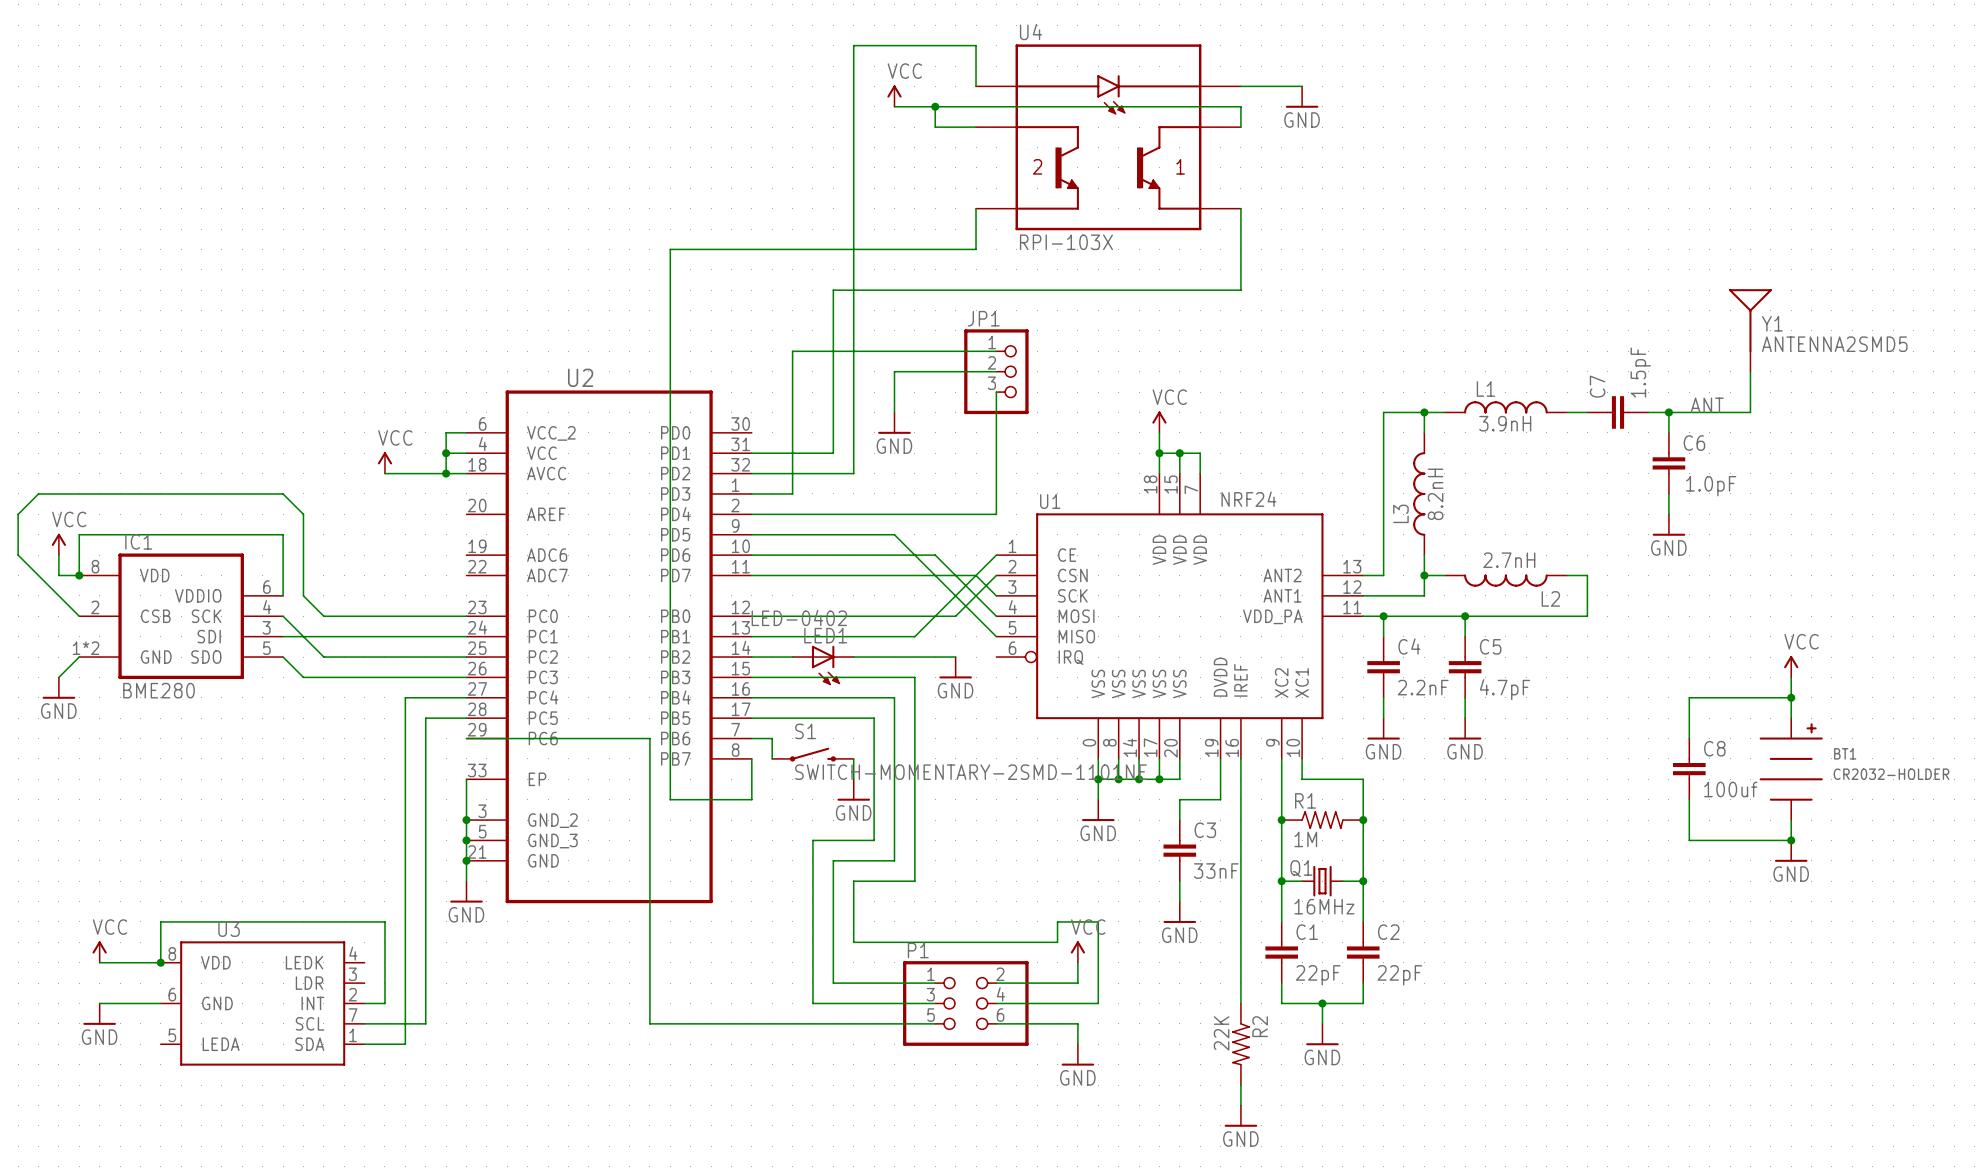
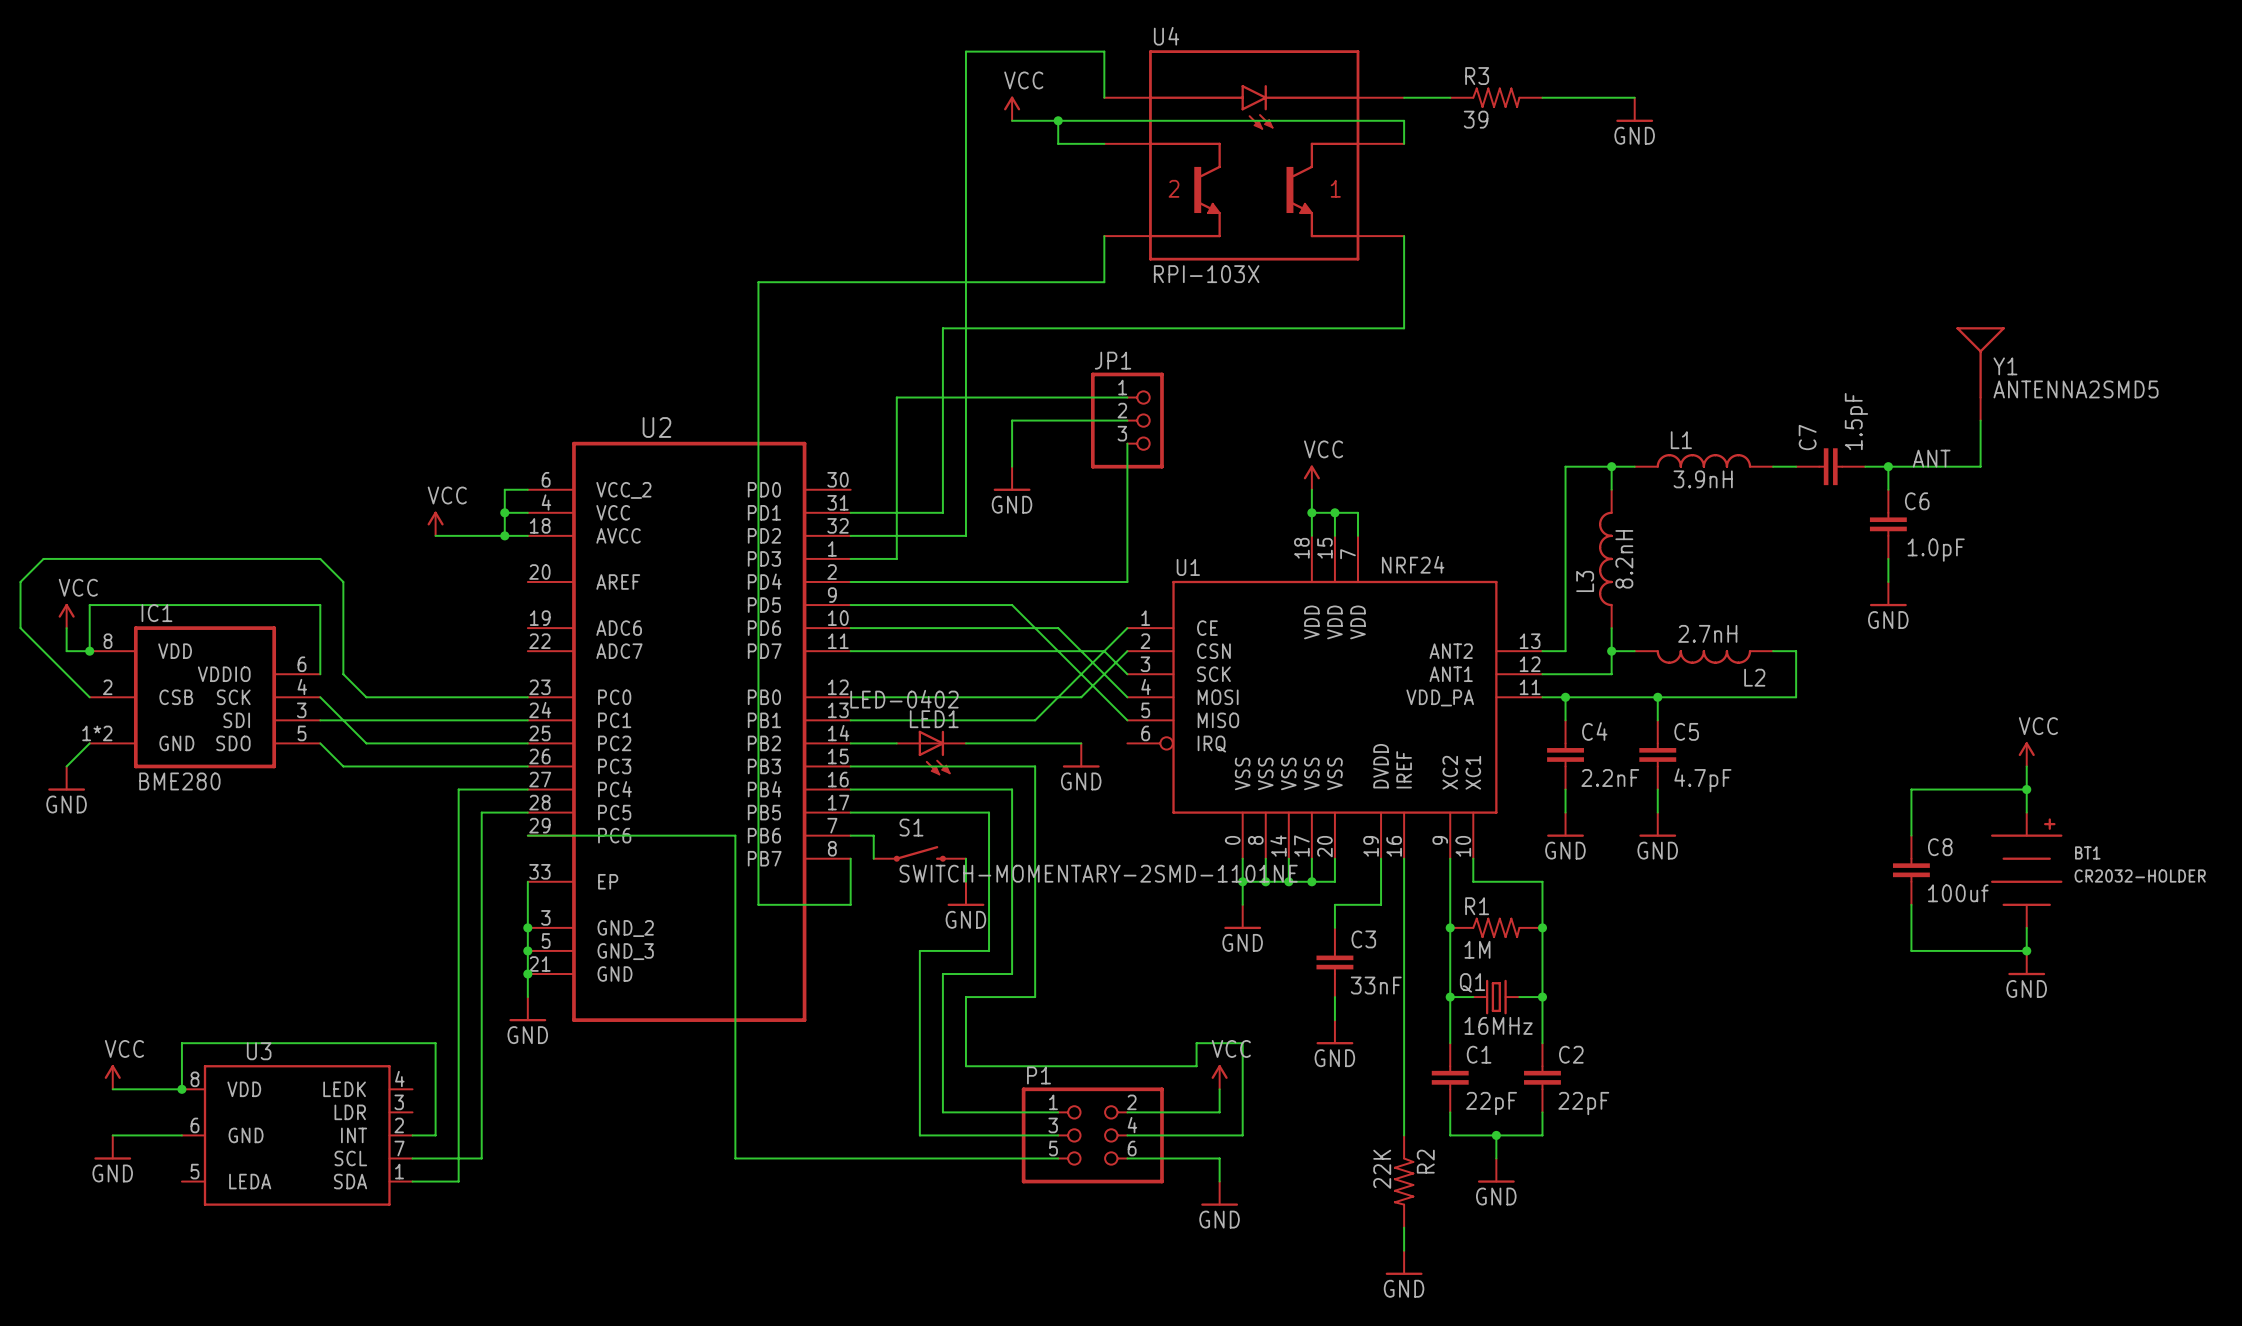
R3: none -> 39 (1496, 97)
wire: none -> (1542, 97) (1634, 97)
power symbol position: GND (1302, 97) -> GND (1634, 109)

